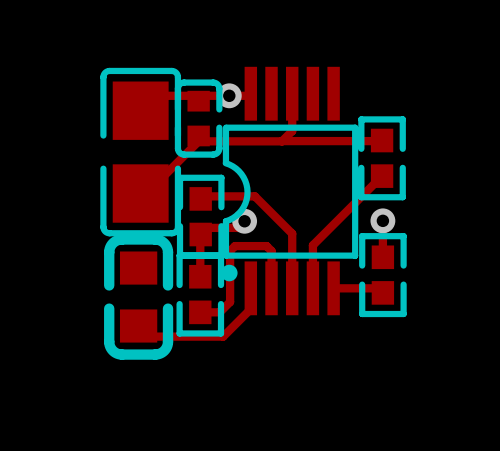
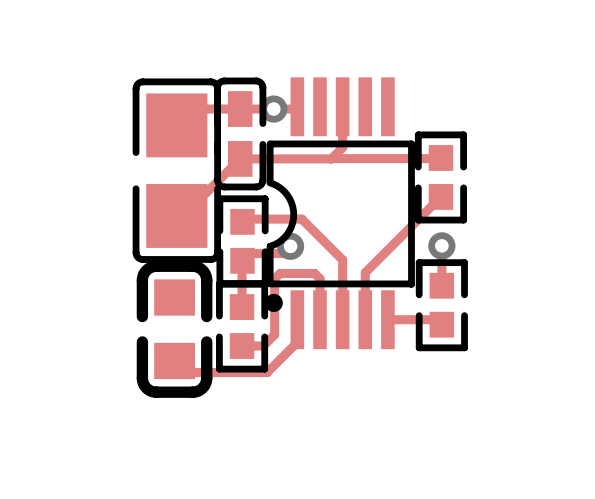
part footprint: [174, 79, 223, 158] -> [214, 77, 267, 191]

